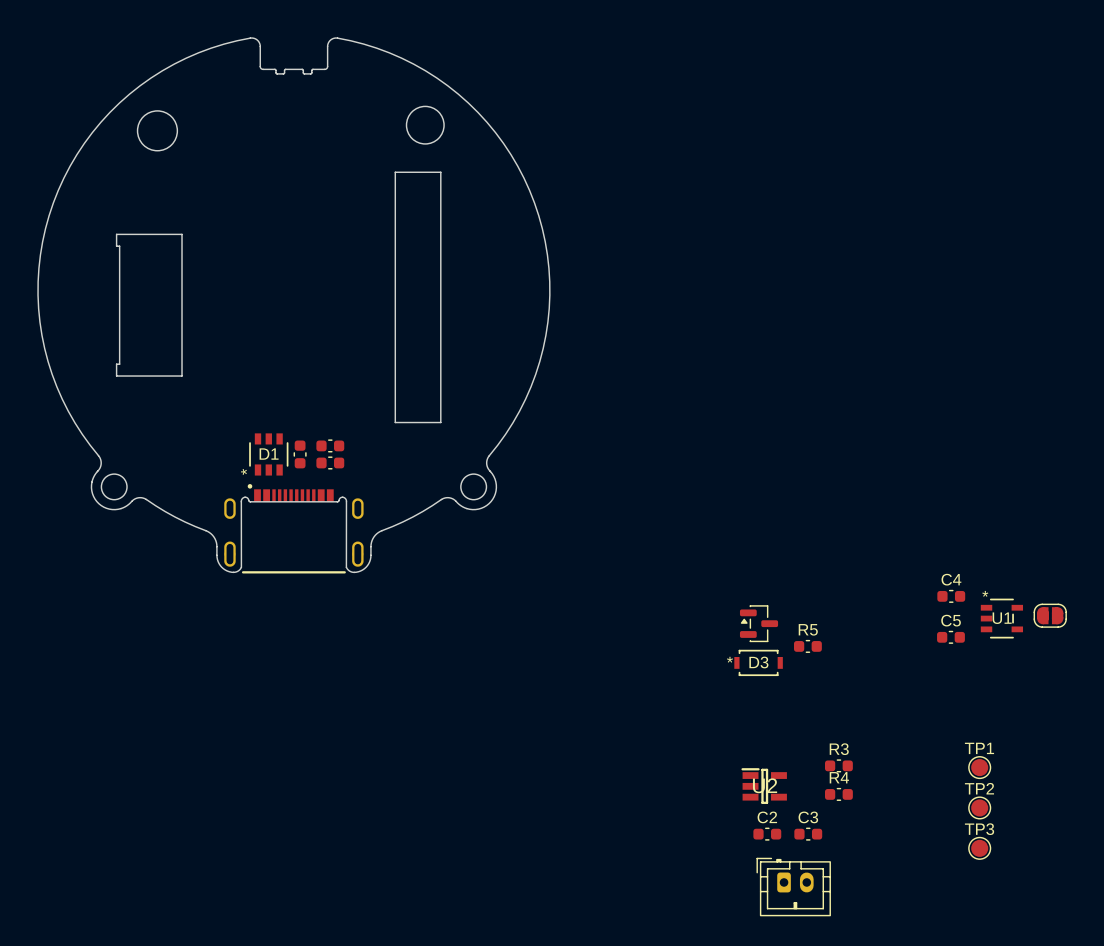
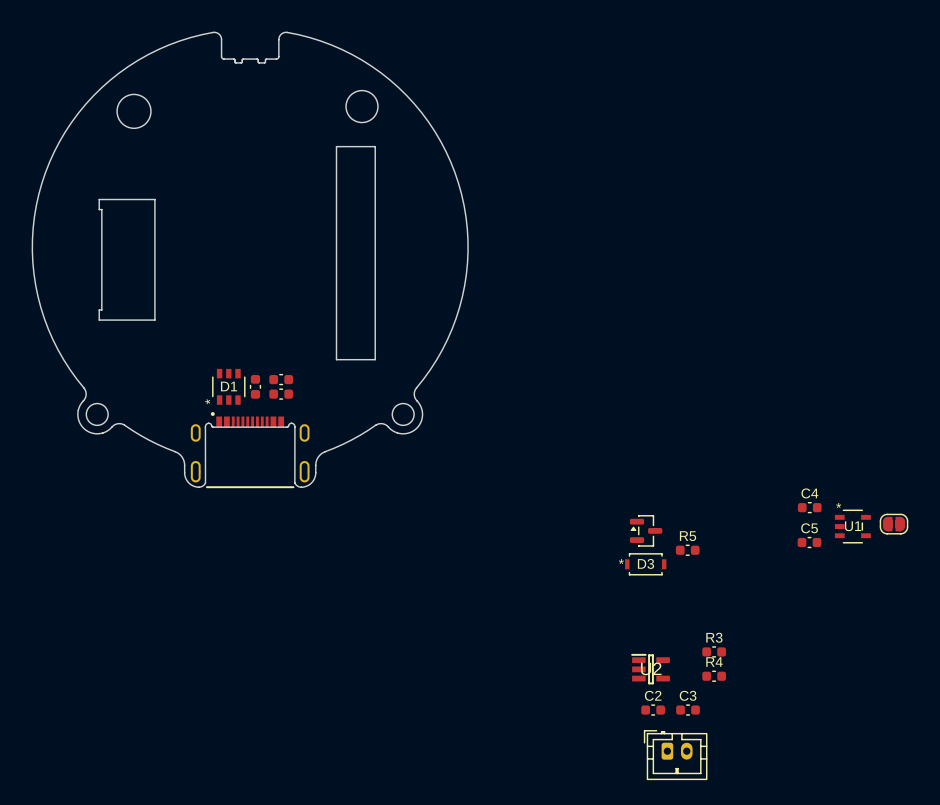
TP1: (979, 767) -> none
TP2: (979, 807) -> none
TP3: (979, 848) -> none

